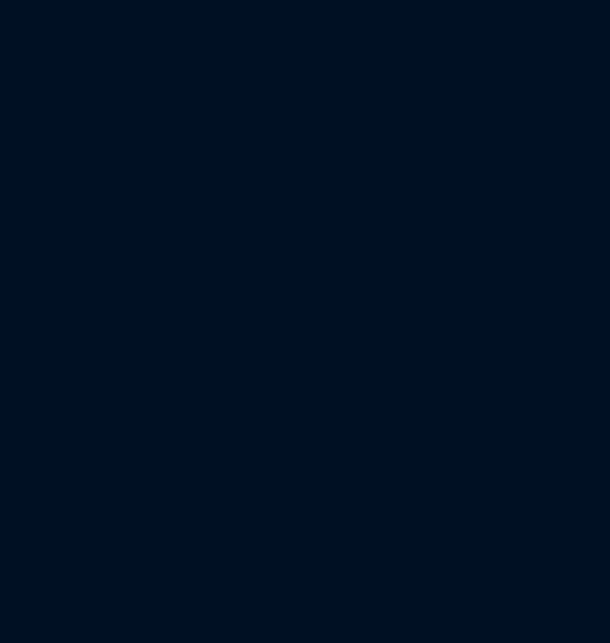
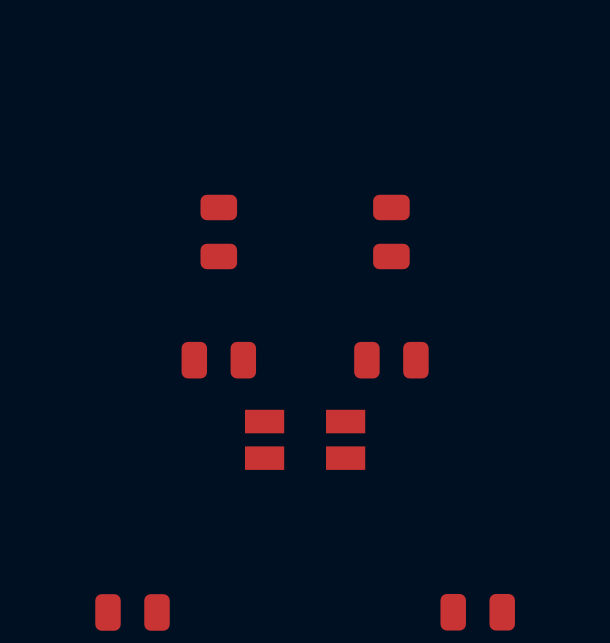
part: none -> (218, 231)
part: none -> (391, 231)
part: none -> (218, 360)
part: none -> (391, 360)
part: none -> (305, 439)
part: none -> (132, 612)
part: none -> (477, 612)

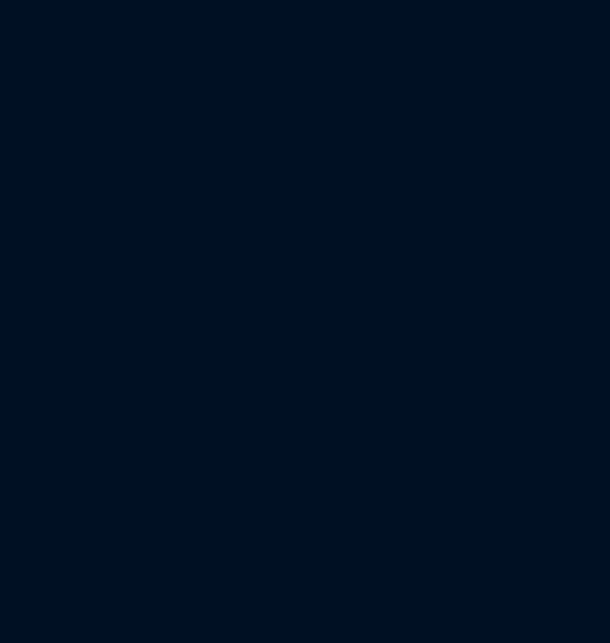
part: (218, 231) -> none
part: (391, 231) -> none
part: (218, 360) -> none
part: (391, 360) -> none
part: (305, 439) -> none
part: (132, 612) -> none
part: (477, 612) -> none

